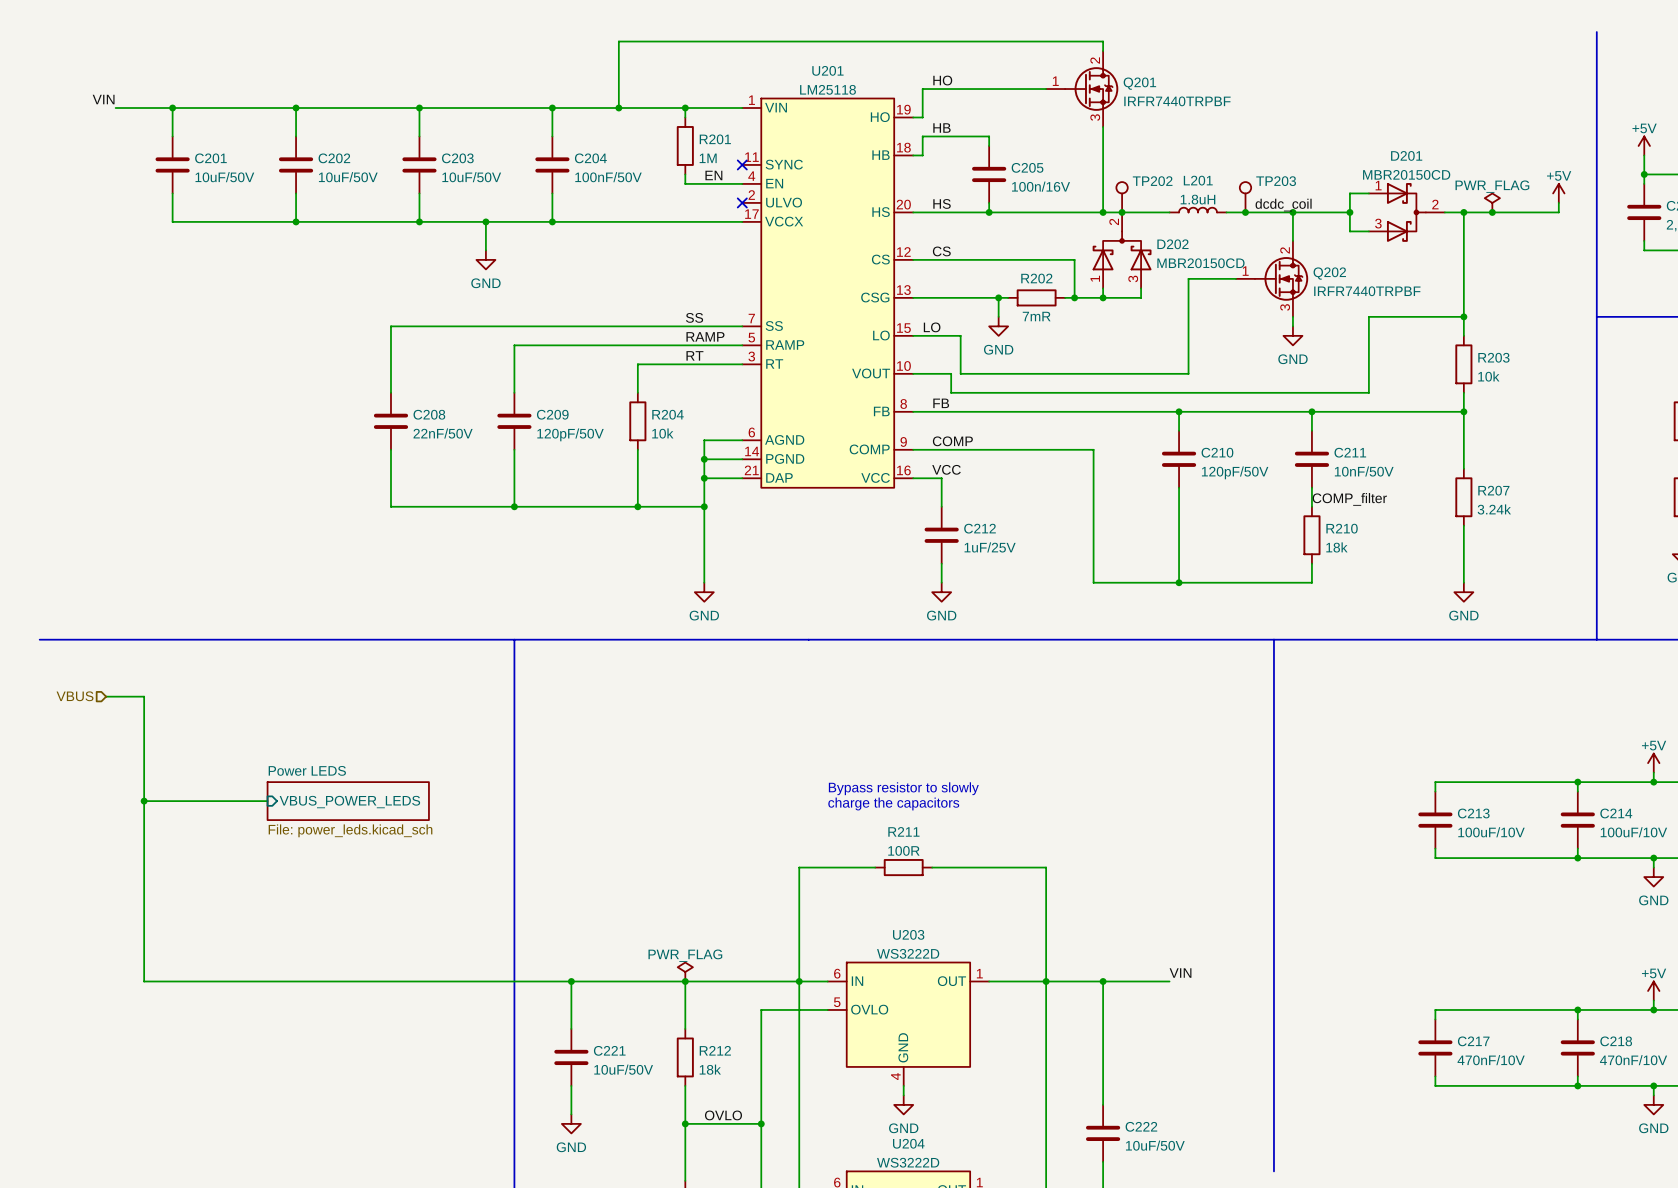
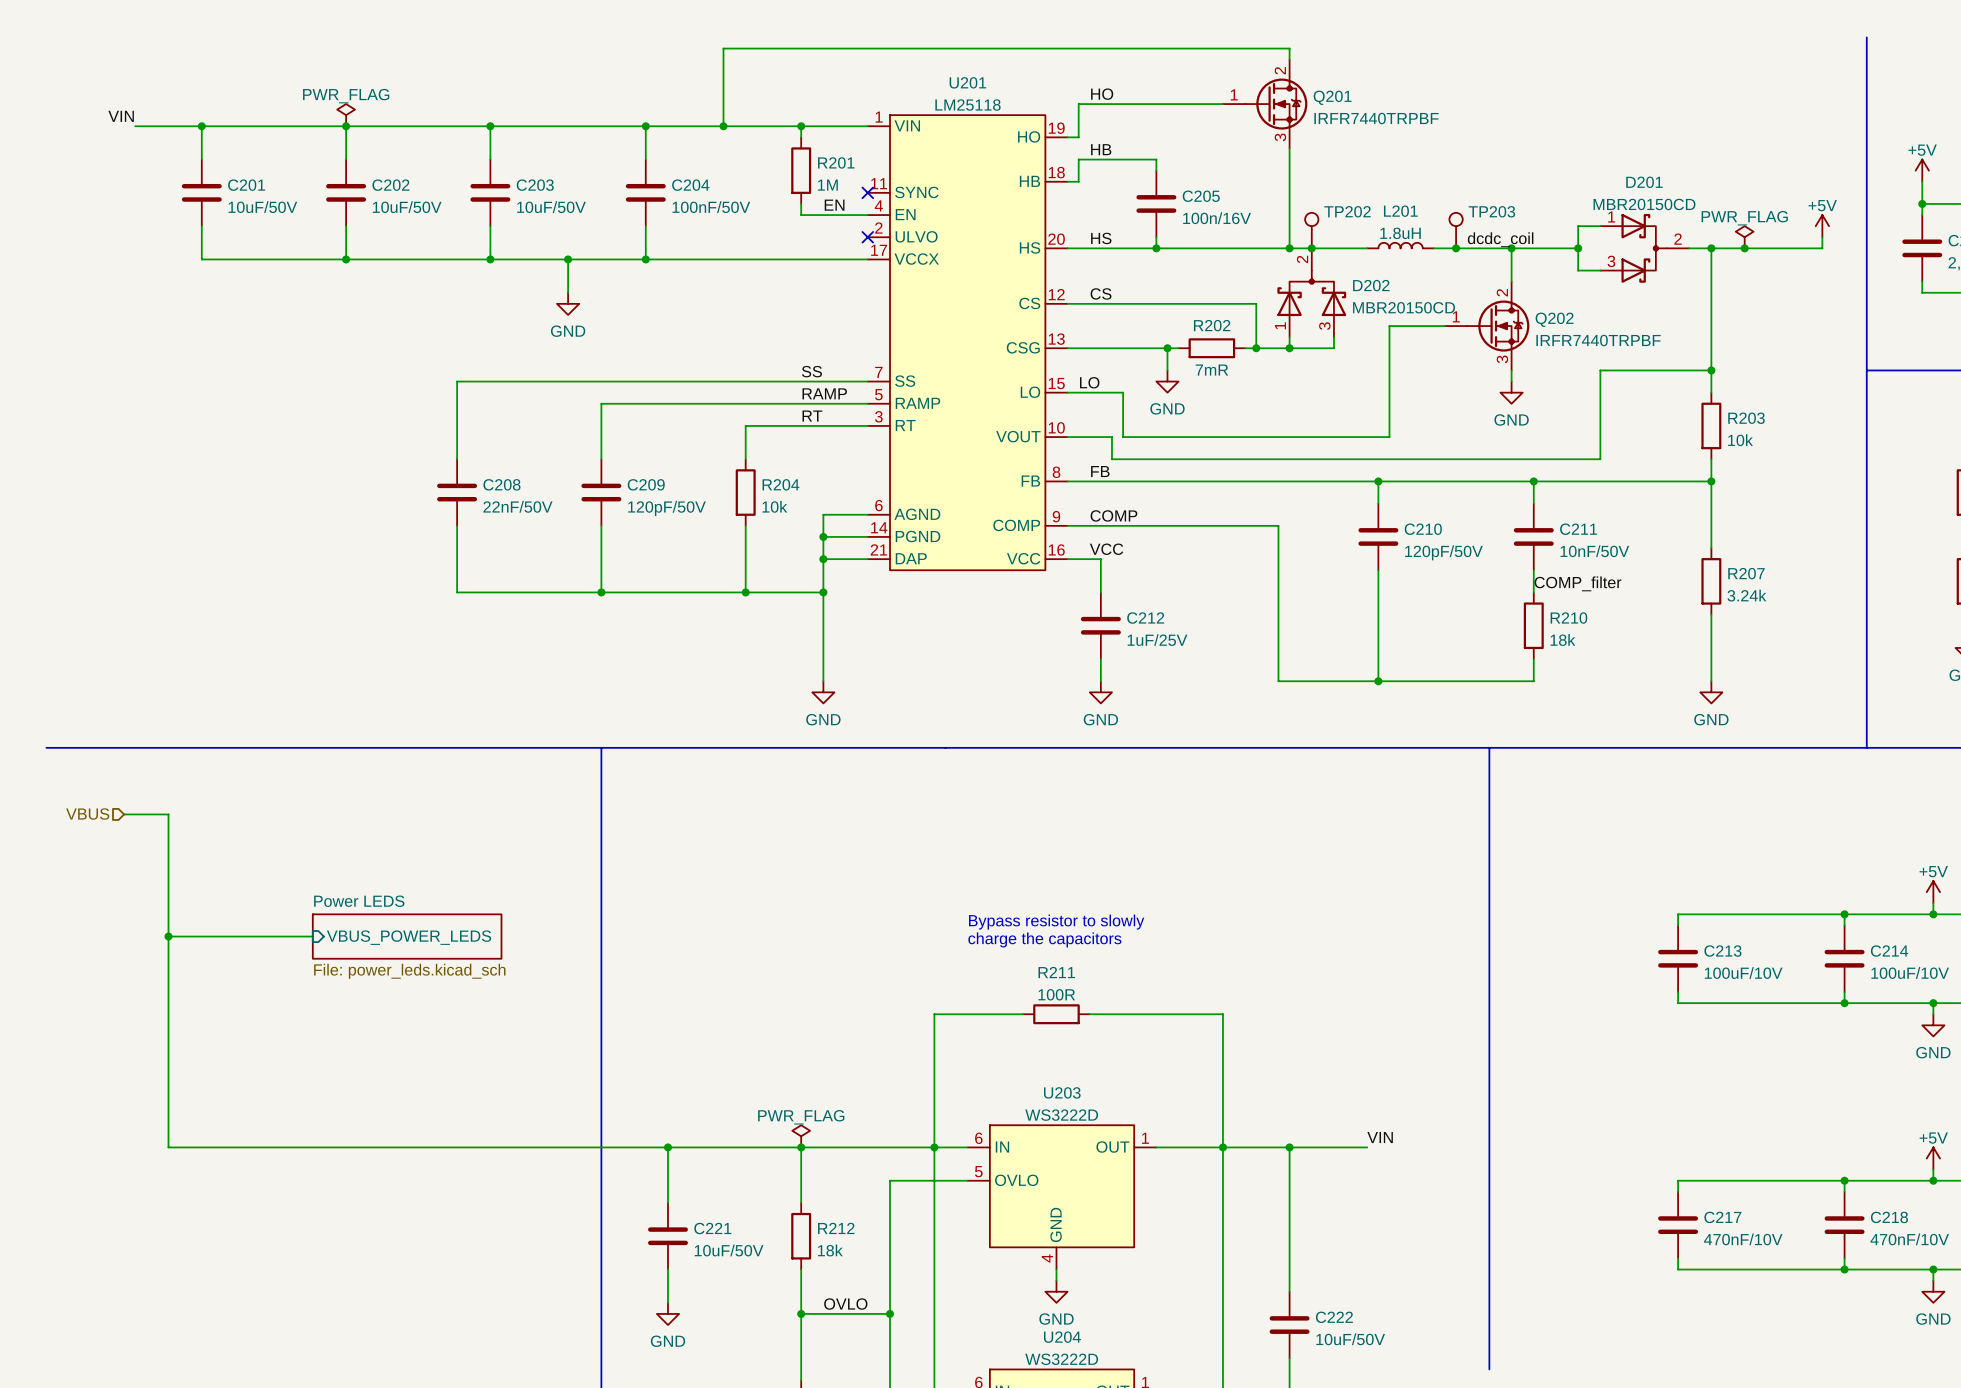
power symbol: none -> PWR_FLAG (346, 115)

